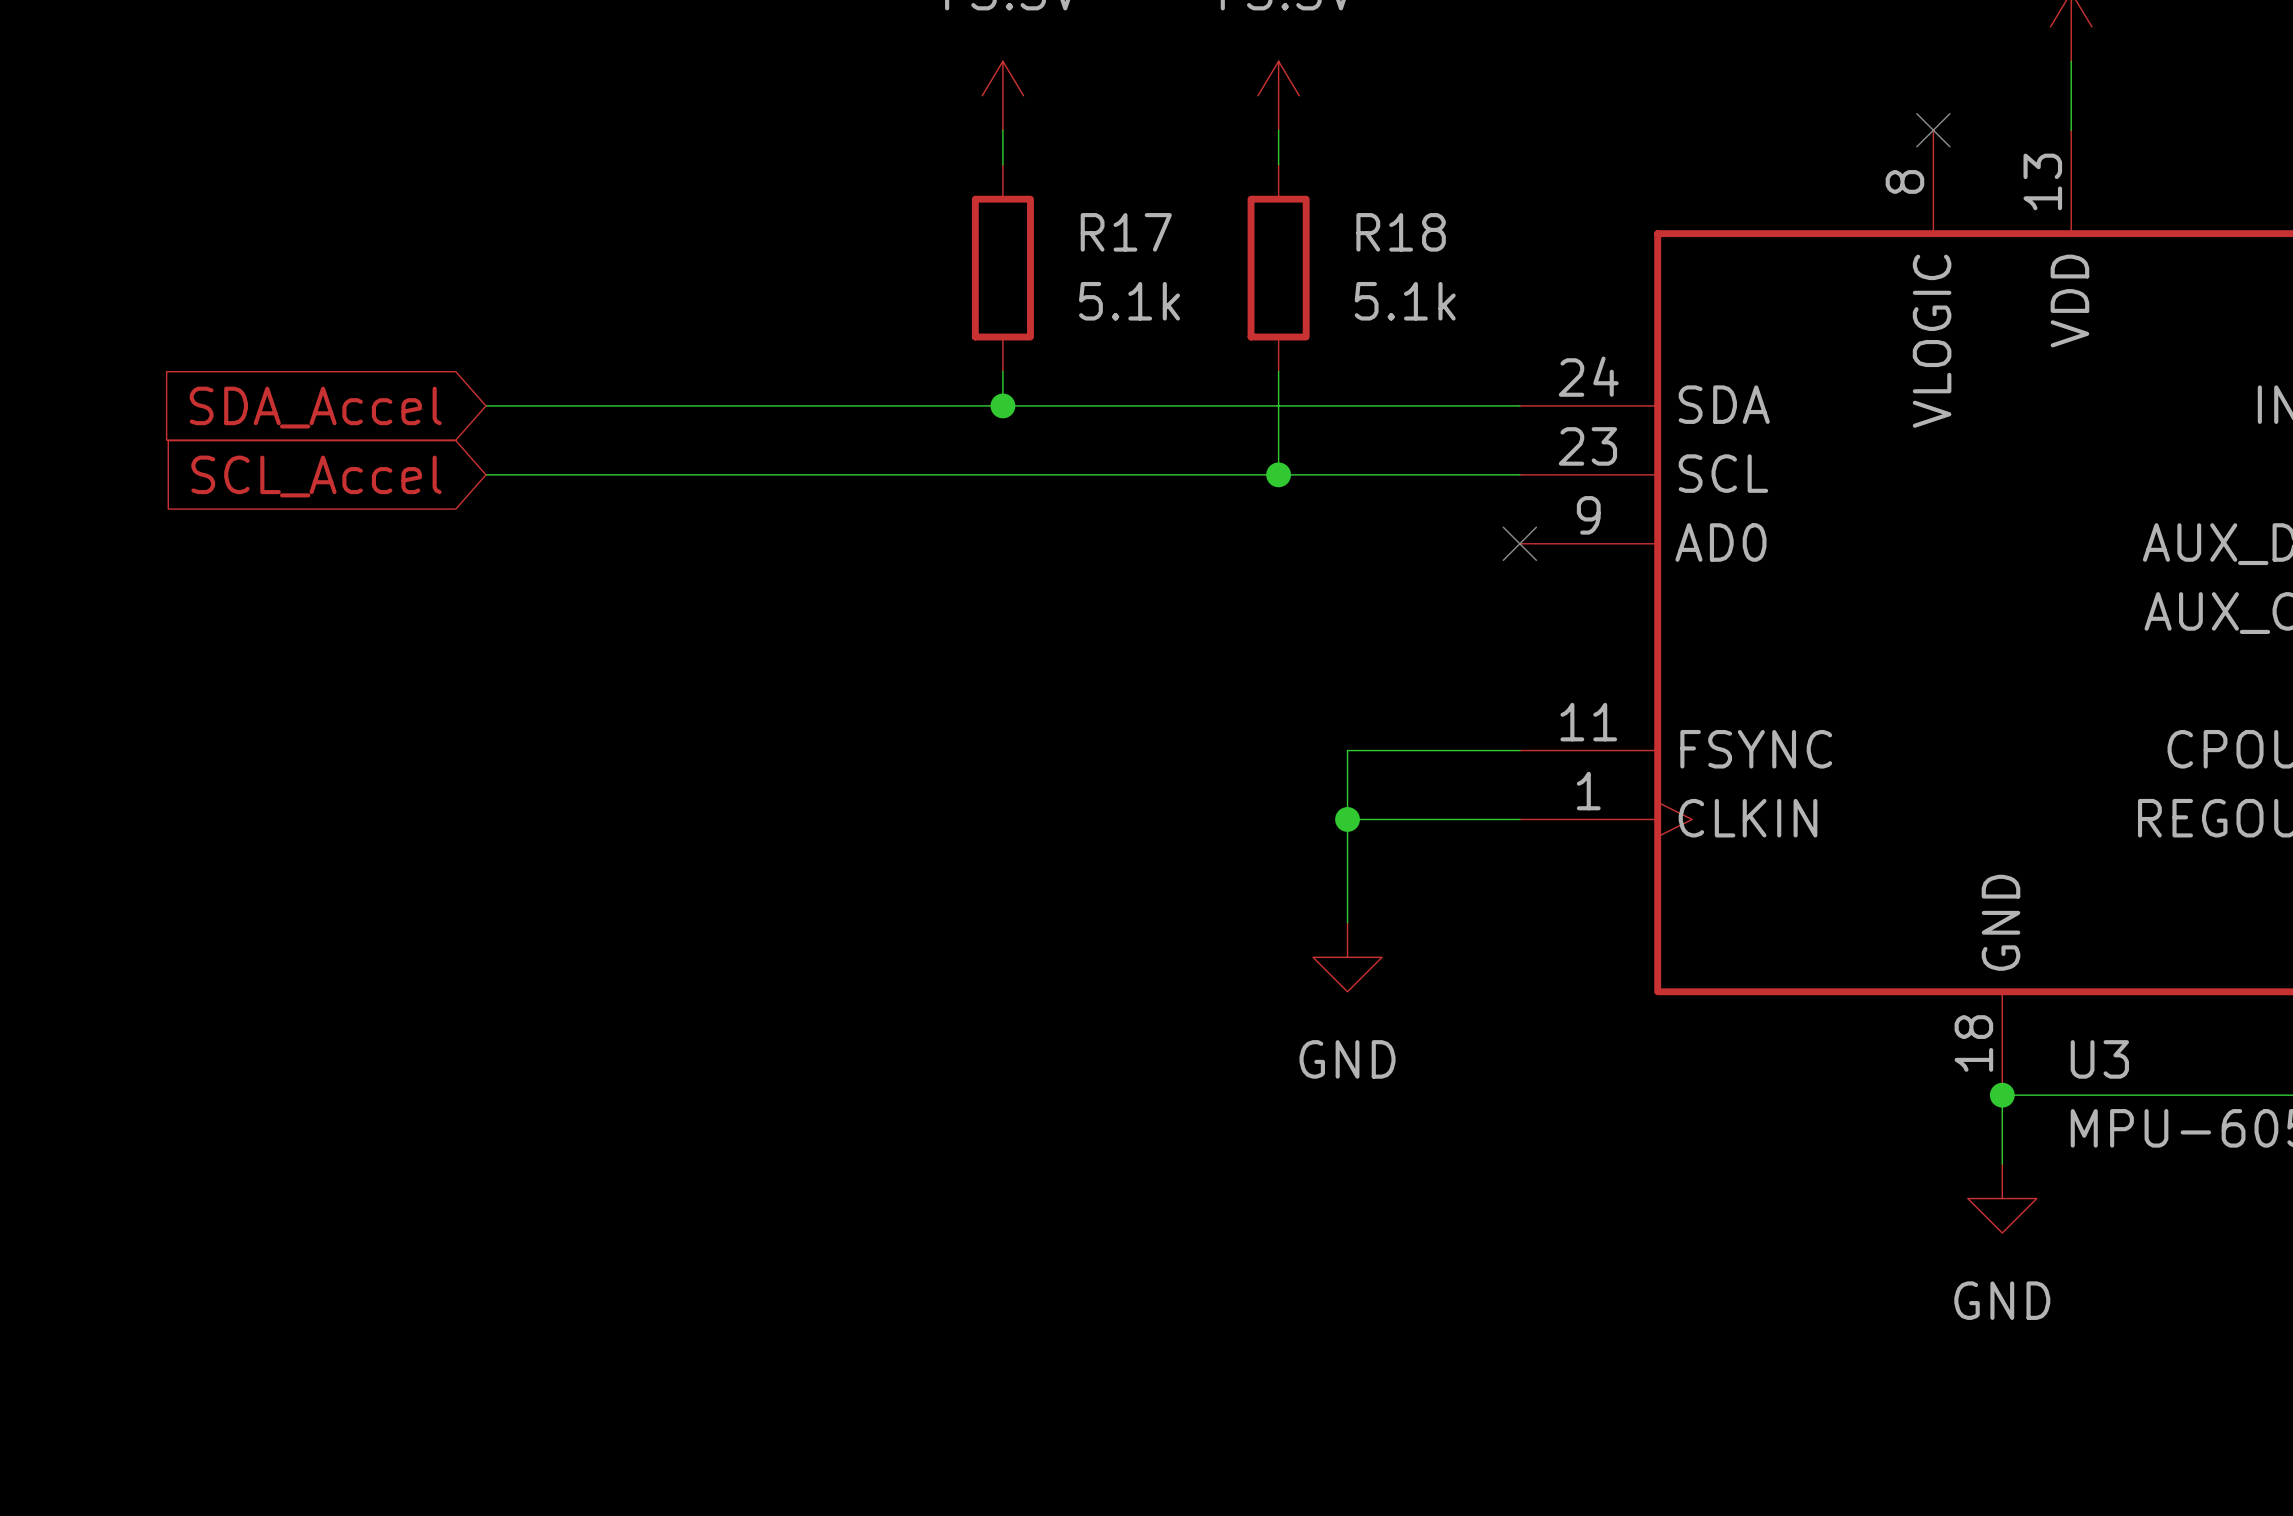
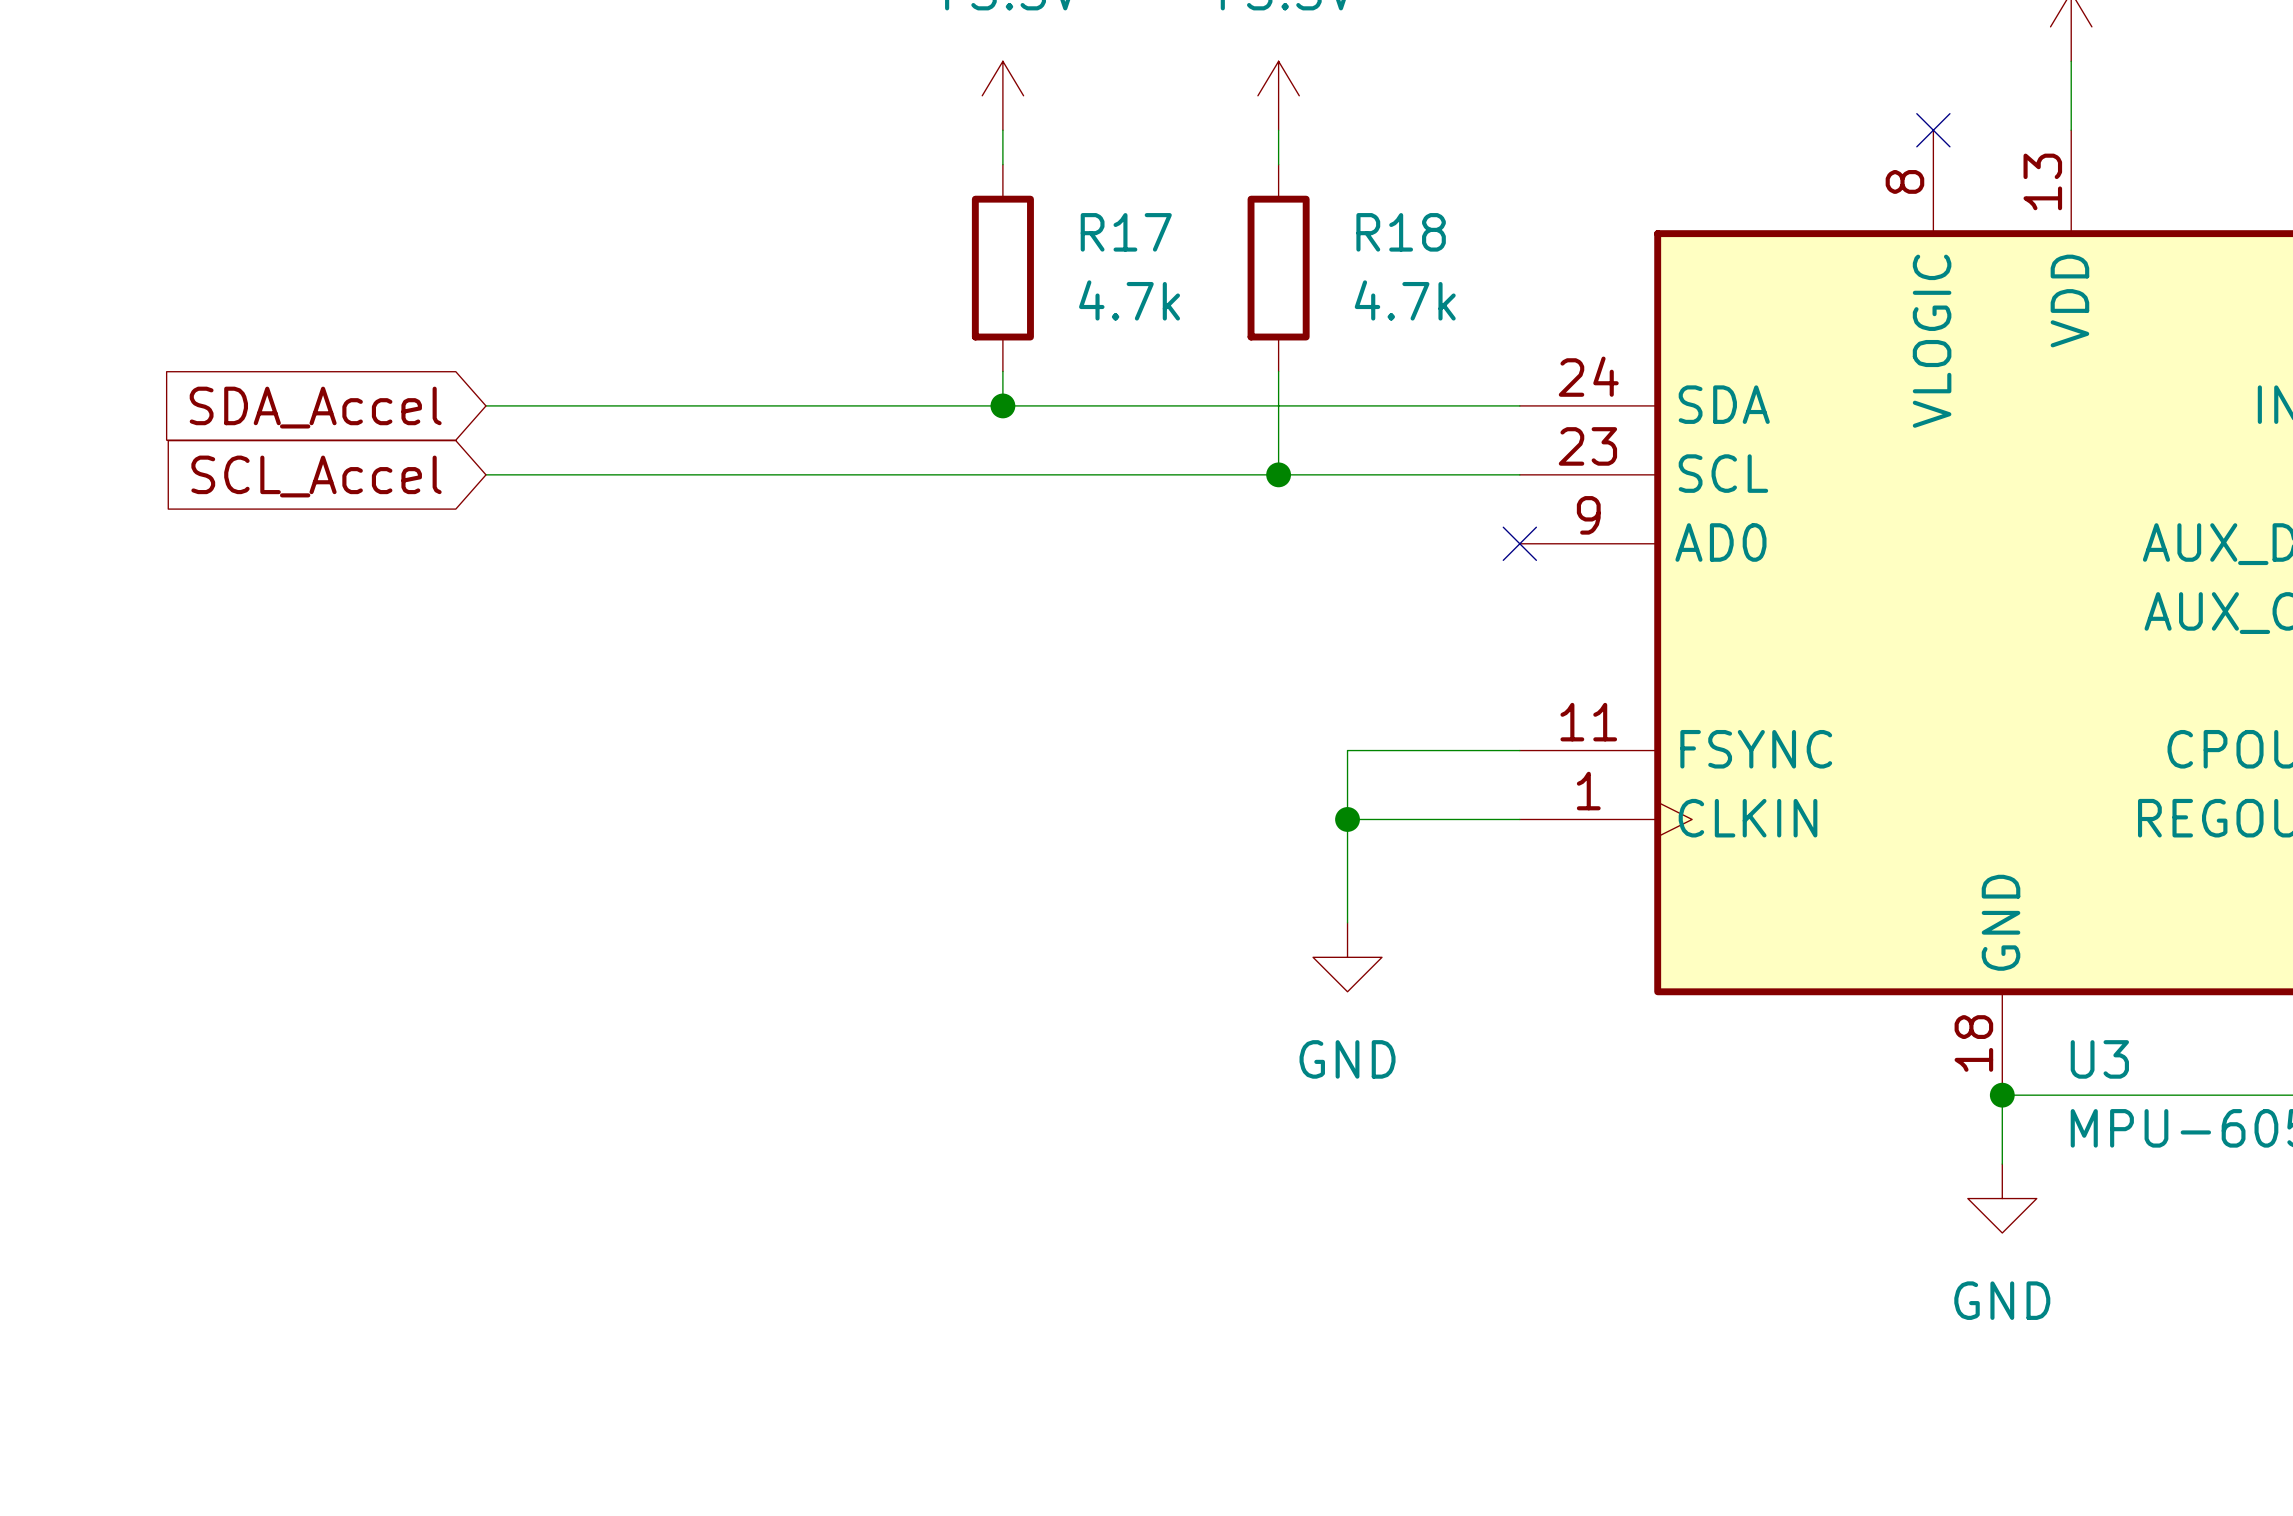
R17 value: 5.1k (1129, 301) -> 4.7k (1129, 300)
R18 value: 5.1k (1405, 301) -> 4.7k (1405, 300)

